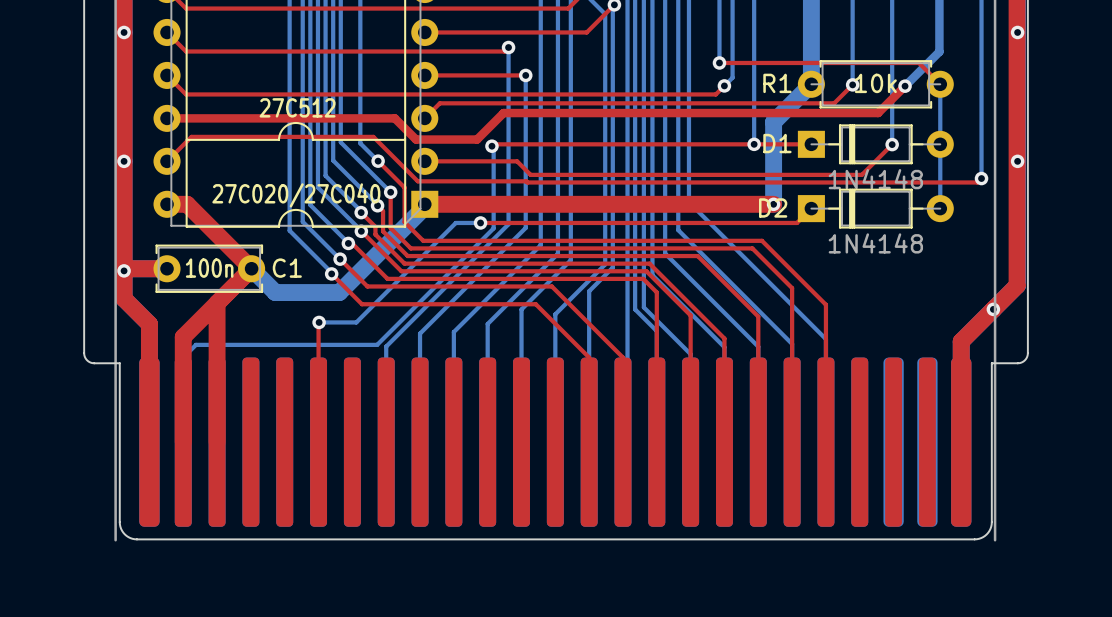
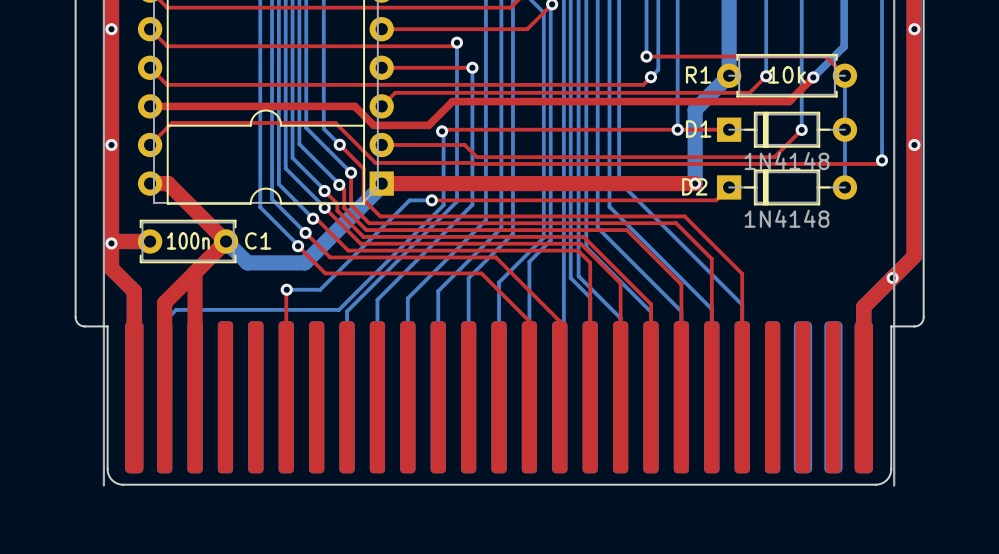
text: 27C512 (297, 107) -> none
text: 27C020/27C040 (296, 195) -> none

